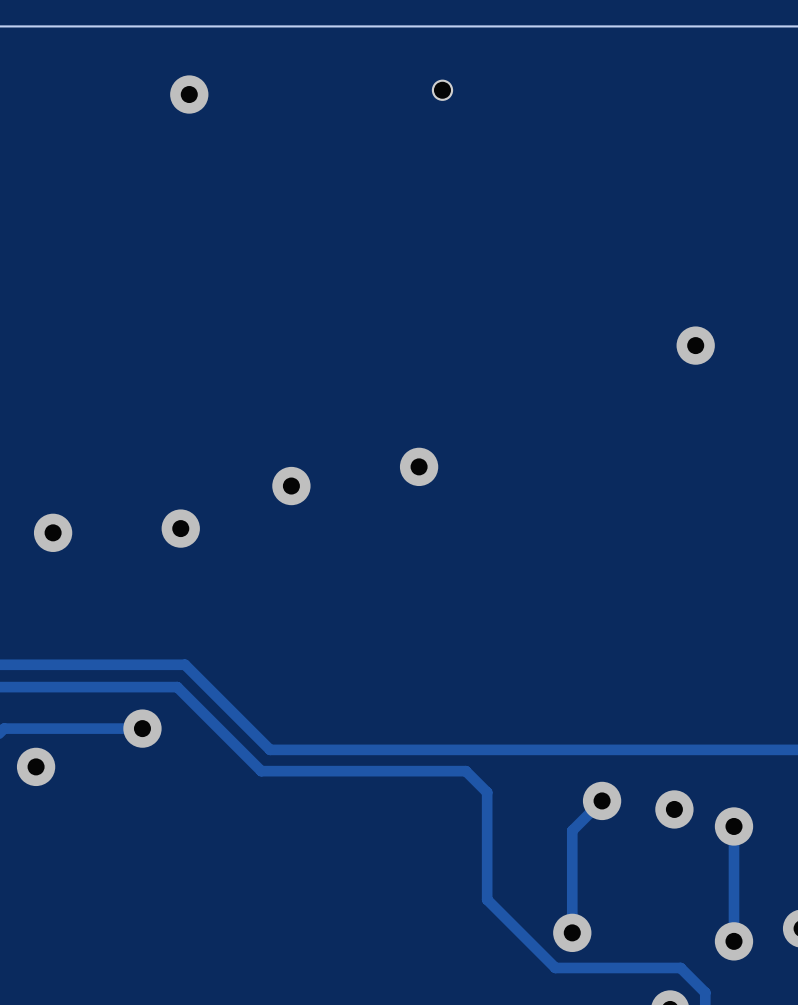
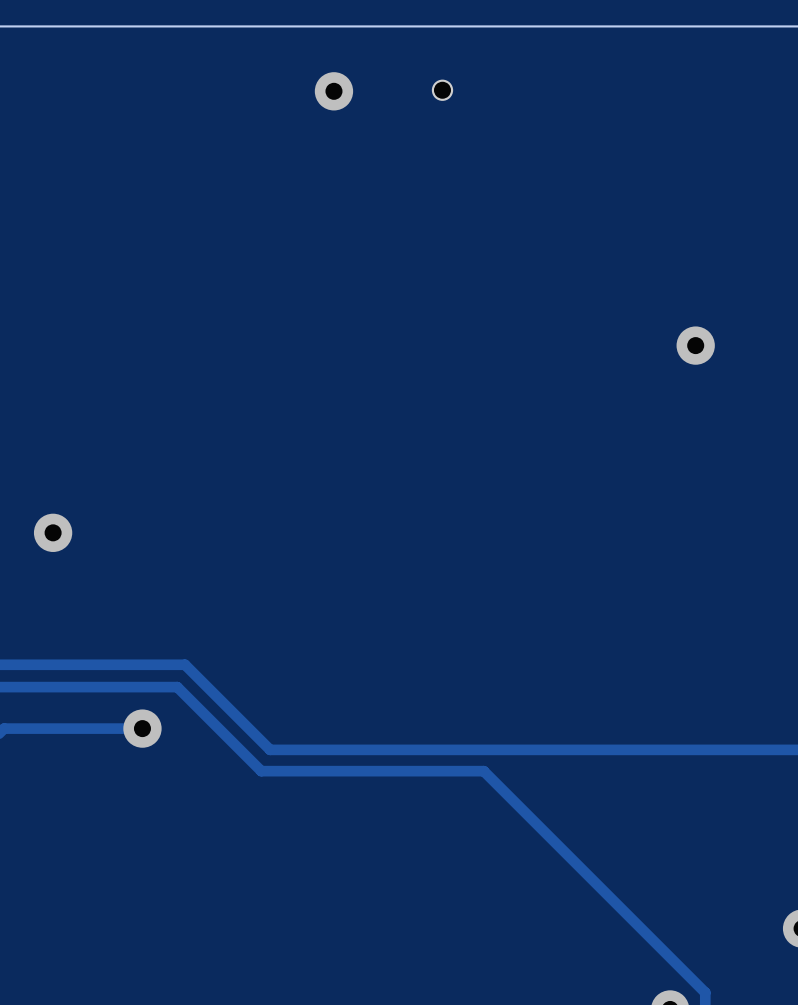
via position: (189, 94) -> (333, 91)
via: (419, 466) -> none
via: (291, 486) -> none
via: (180, 528) -> none
via: (36, 766) -> none
track: (465, 771) (487, 792) (487, 899) (555, 967) (680, 967) -> (465, 771) (483, 771) (680, 967)
track: (602, 800) (572, 830) (572, 932) -> none
via: (602, 800) -> none
via: (674, 809) -> none
track: (734, 826) (734, 941) -> none
via: (734, 826) -> none
via: (572, 932) -> none
via: (734, 941) -> none

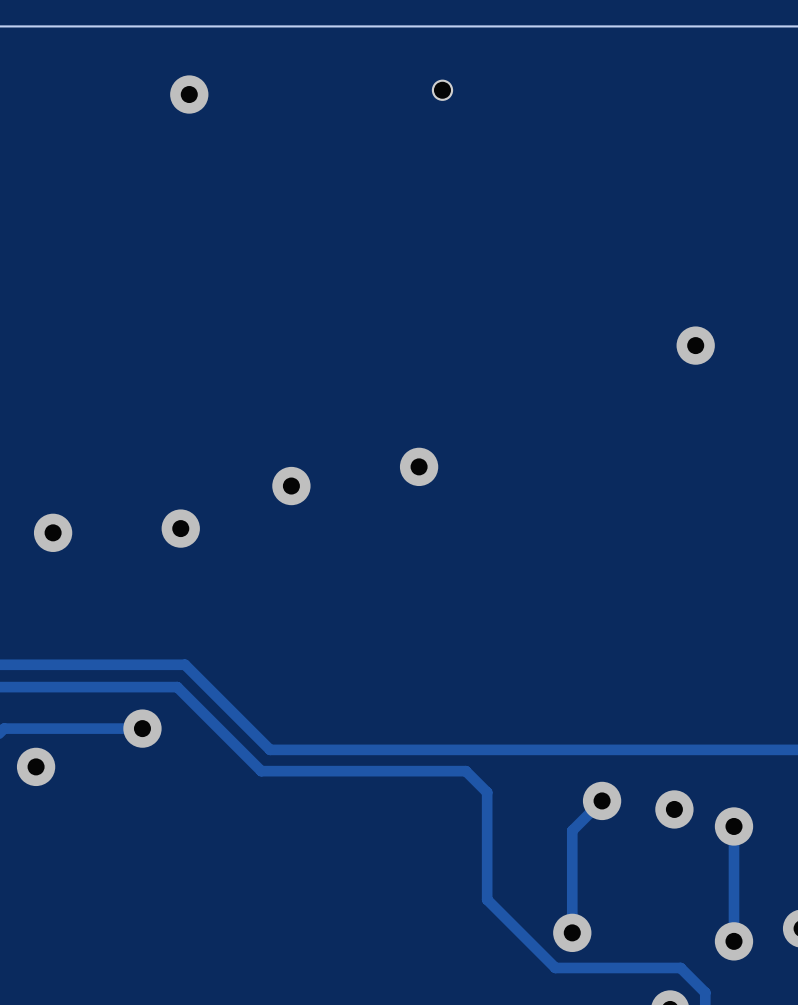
via position: (333, 91) -> (189, 94)
via: none -> (419, 466)
via: none -> (291, 486)
via: none -> (180, 528)
via: none -> (36, 766)
track: (465, 771) (483, 771) (680, 967) -> (465, 771) (487, 792) (487, 899) (555, 967) (680, 967)
track: none -> (602, 800) (572, 830) (572, 932)
via: none -> (602, 800)
via: none -> (674, 809)
track: none -> (734, 826) (734, 941)
via: none -> (734, 826)
via: none -> (572, 932)
via: none -> (734, 941)

